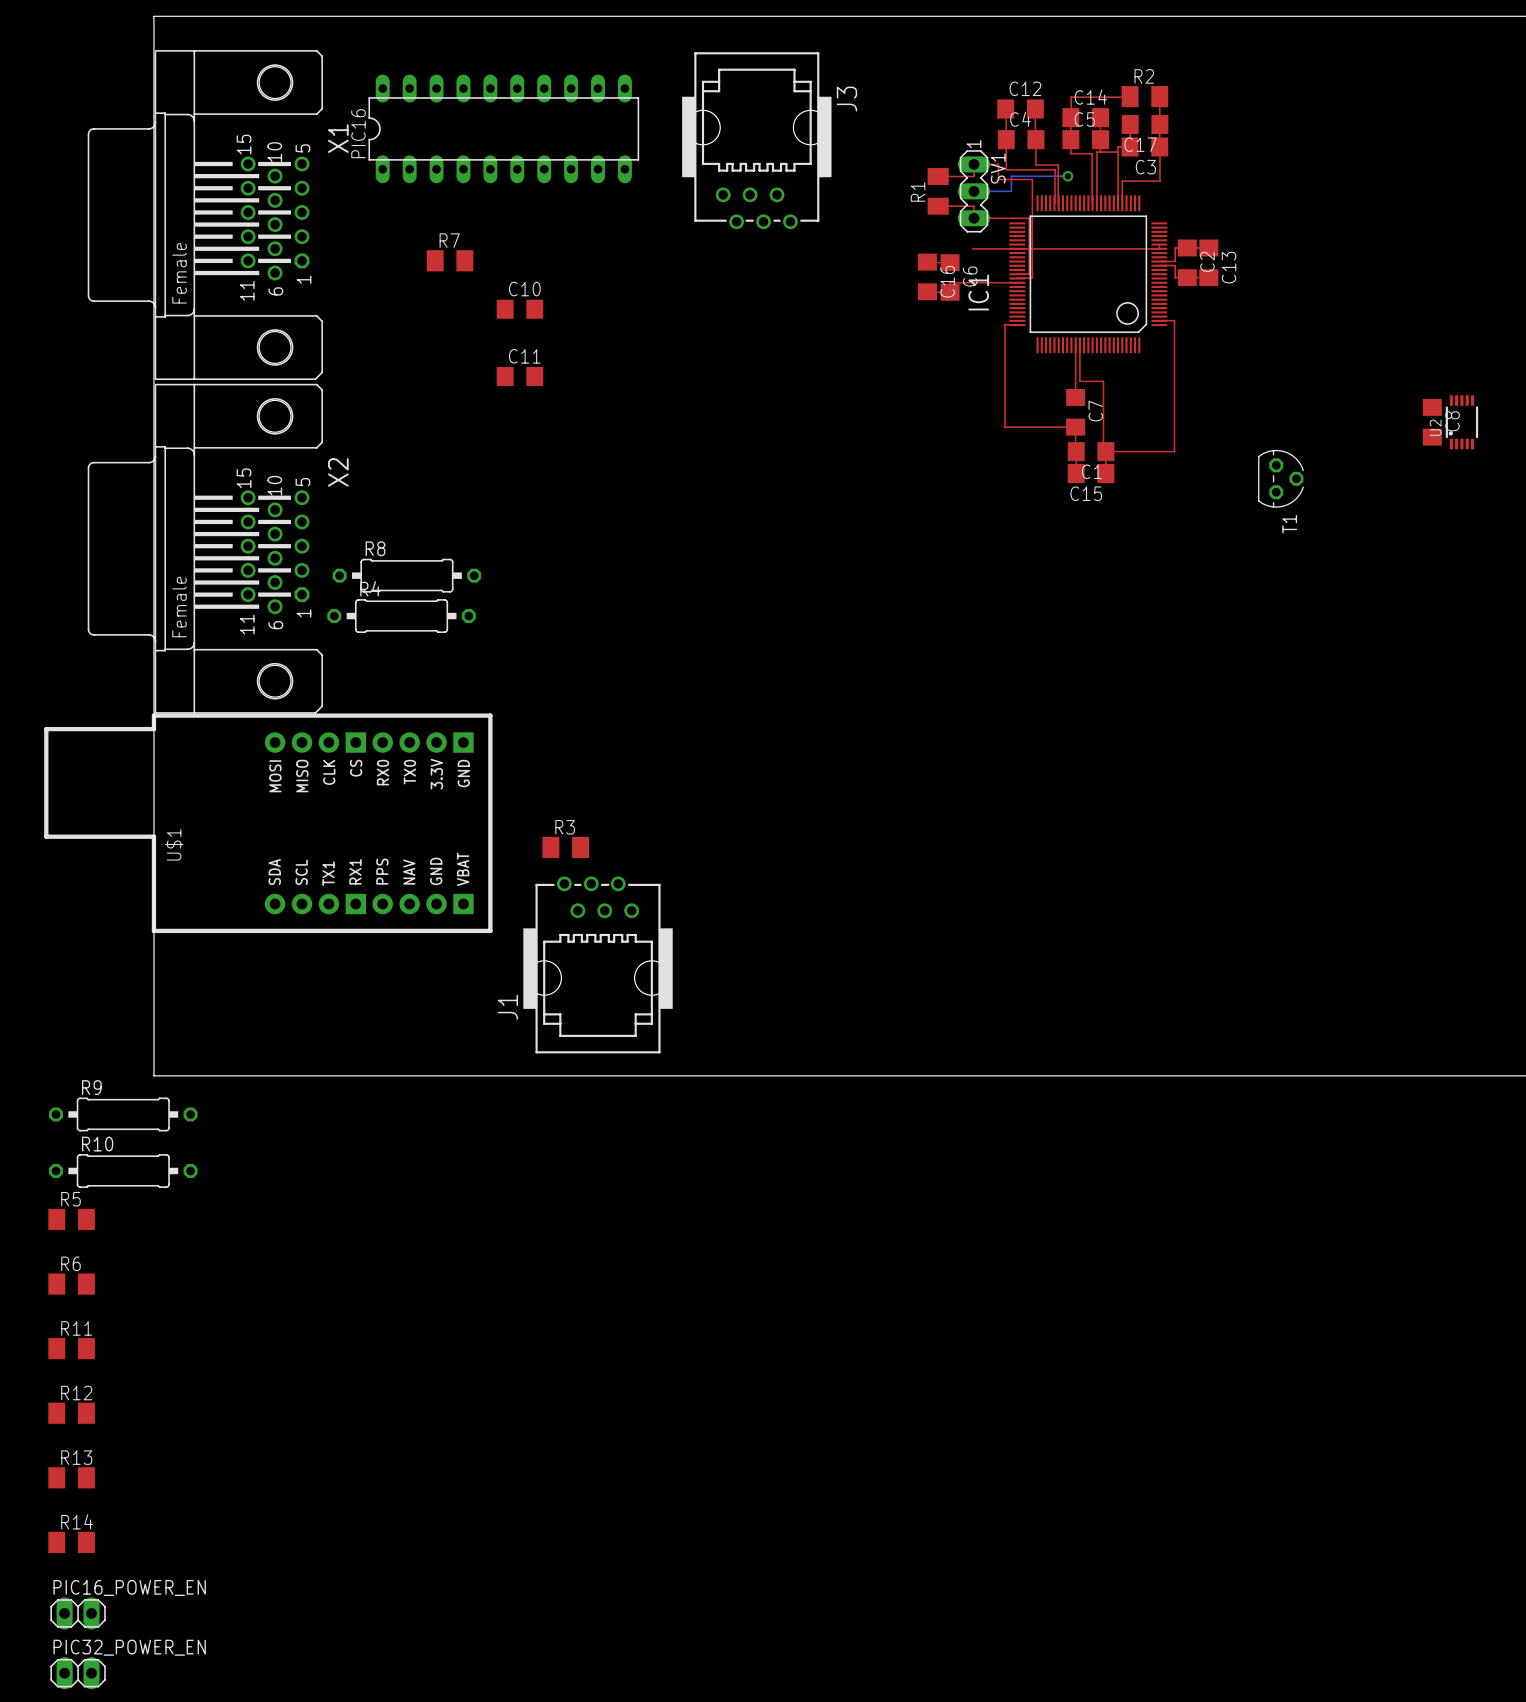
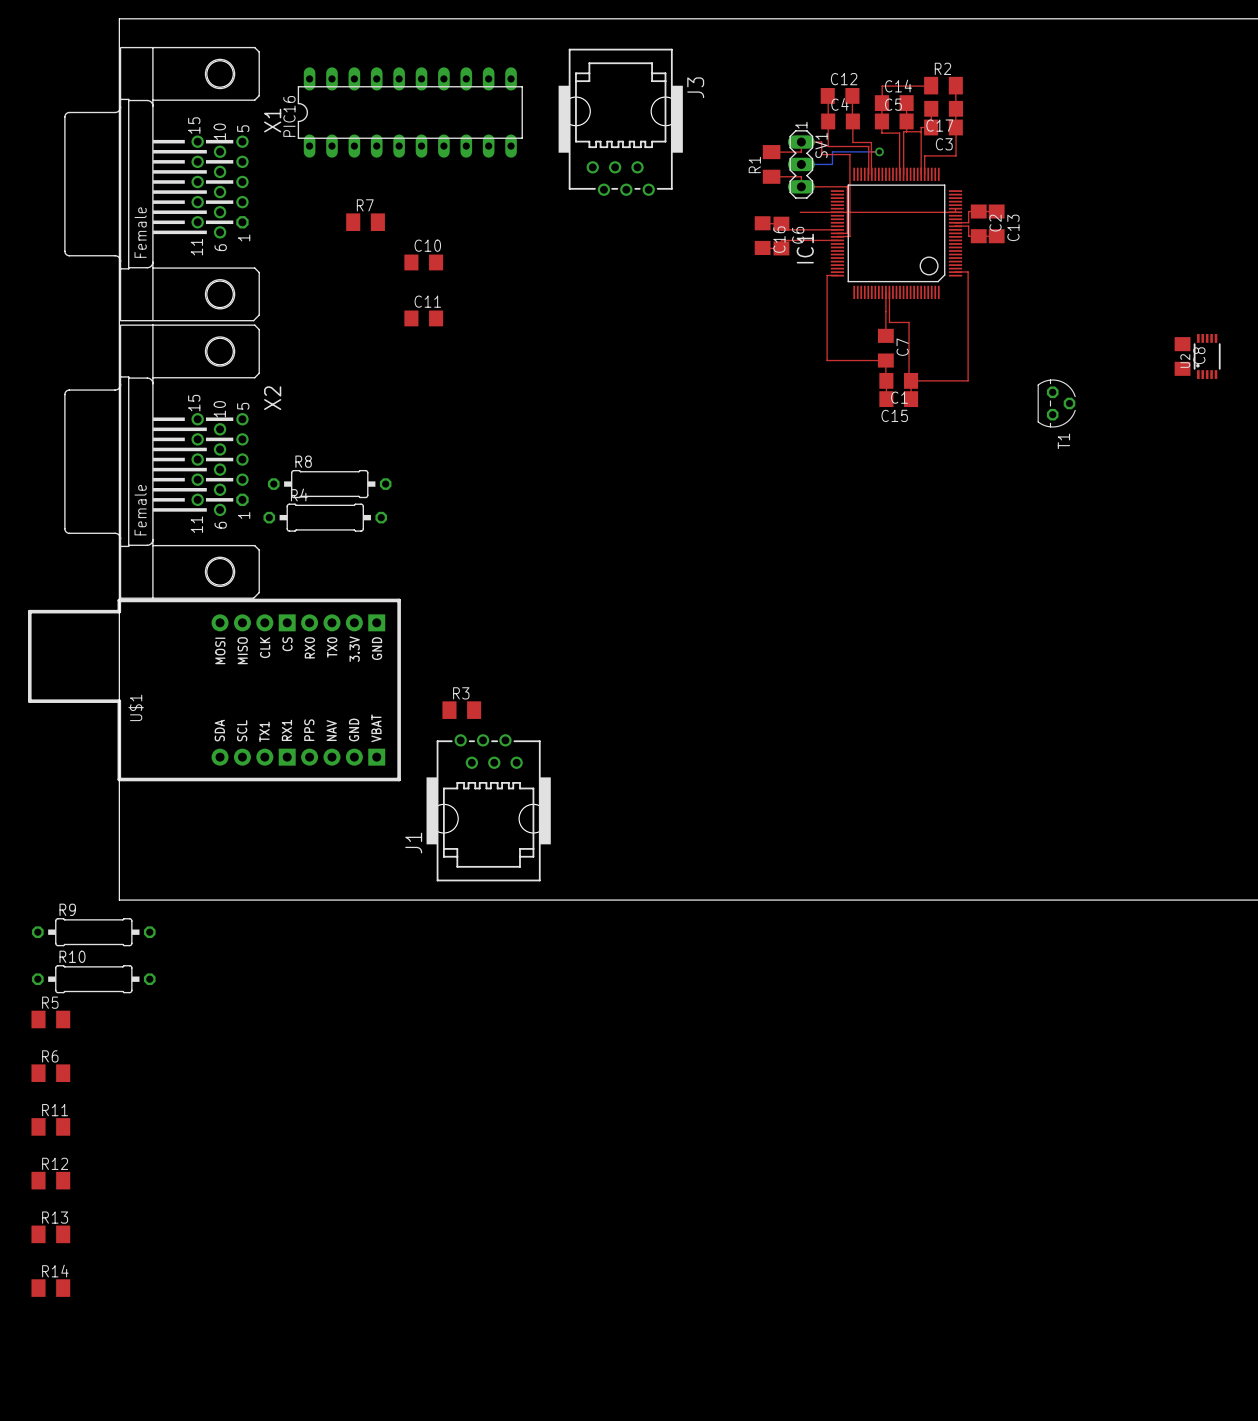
top track: none -> (781, 229) (837, 229)
PIC16_POWER_EN: (78, 1613) -> none
PIC32_POWER_EN: (78, 1673) -> none

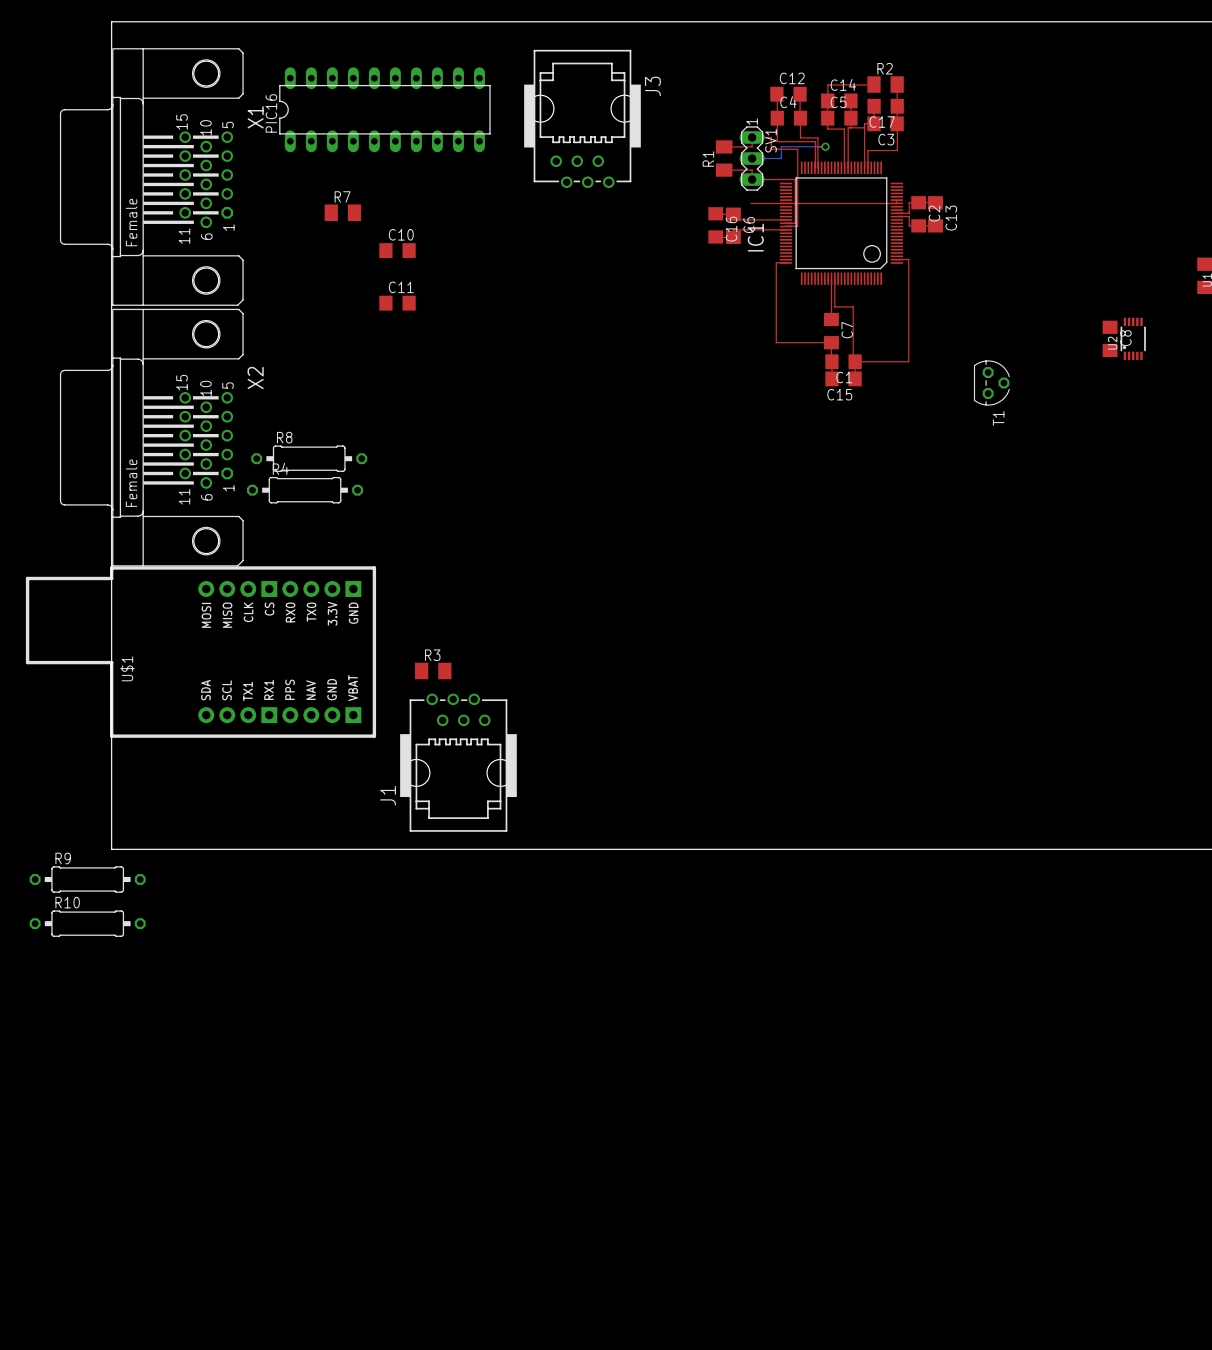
R5: (50, 1019) -> none
R6: (50, 1073) -> none
R11: (50, 1126) -> none
R12: (50, 1180) -> none
R13: (50, 1234) -> none
R14: (50, 1288) -> none

